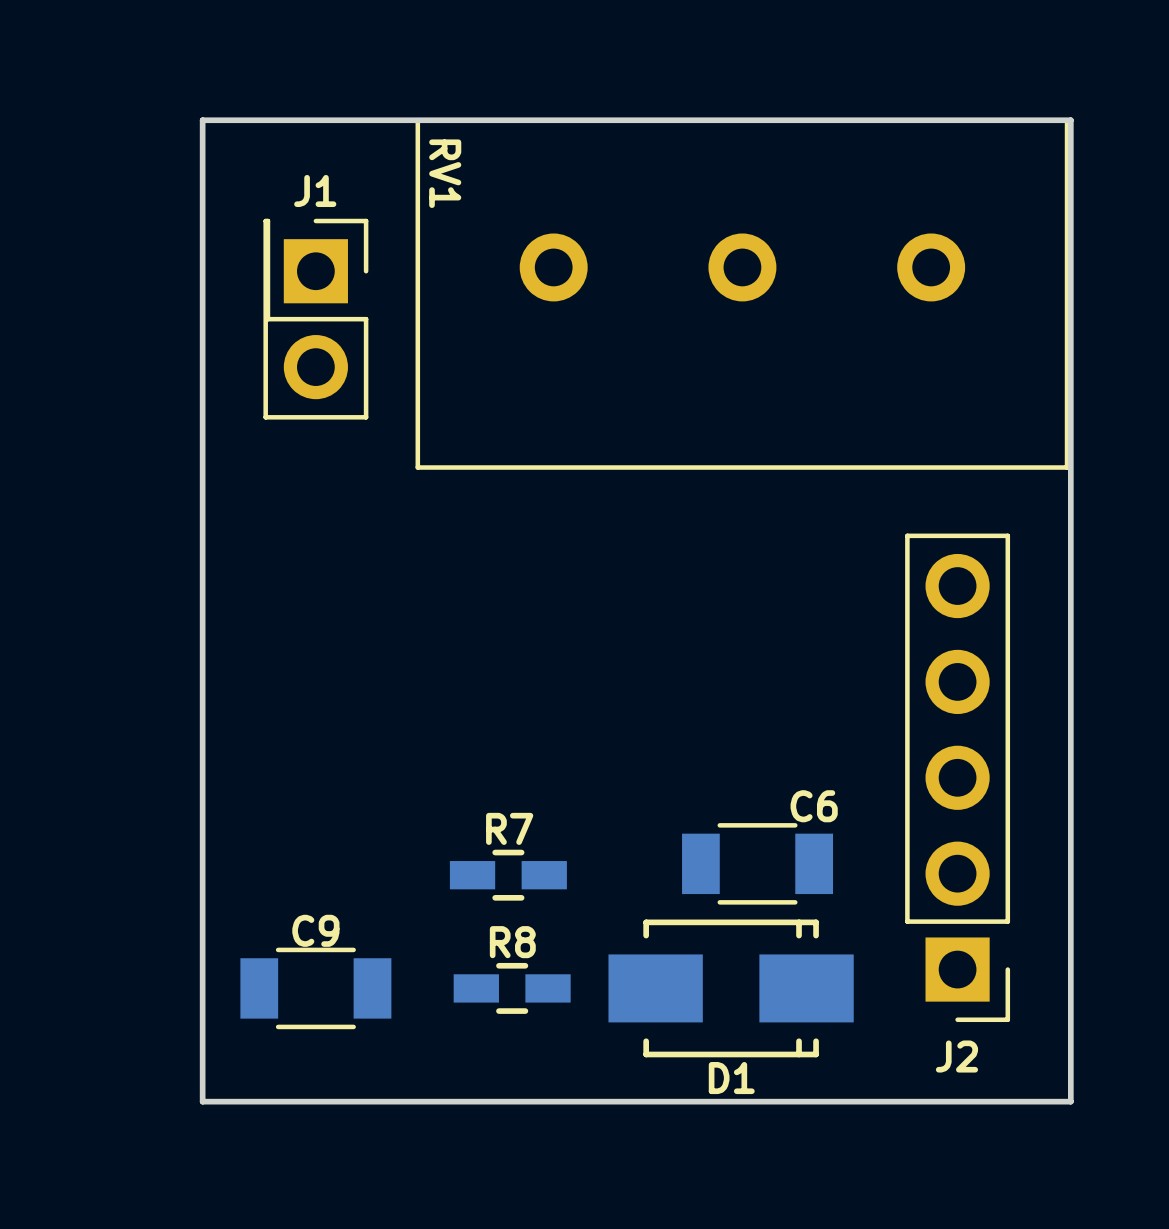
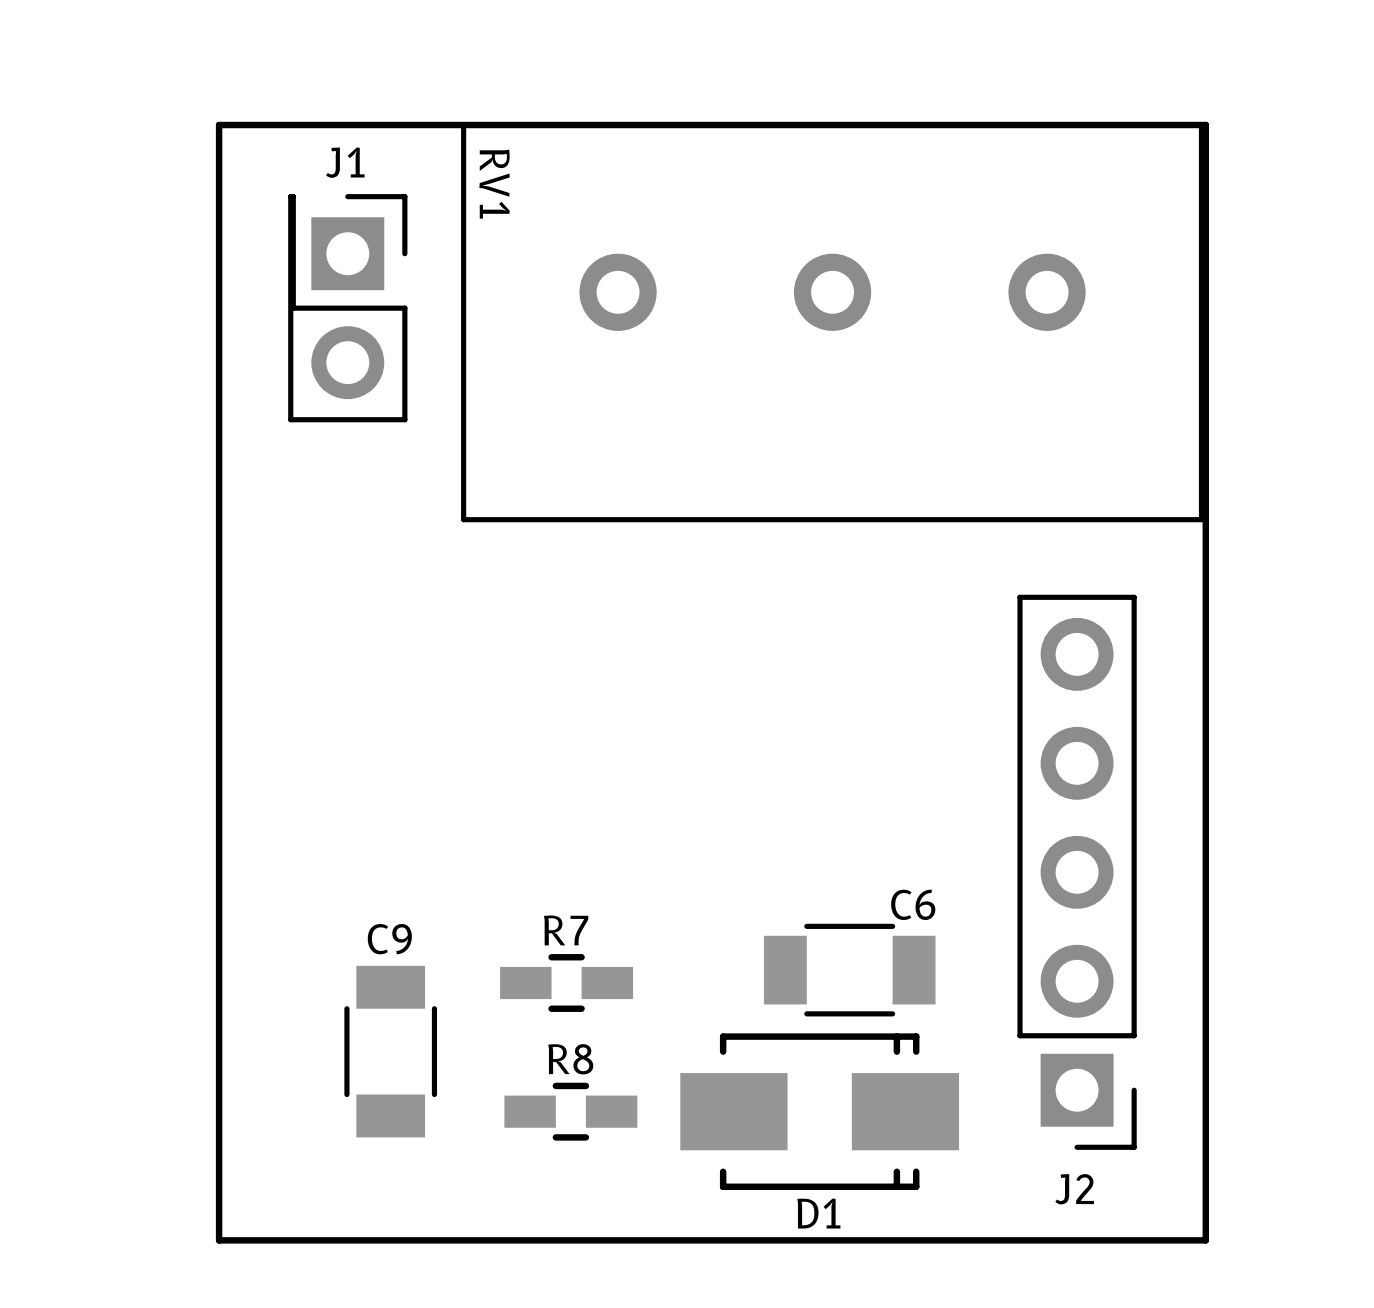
J1 position: (315, 319) -> (347, 308)
C9 rotation: 0° (315, 988) -> 90° clockwise (390, 1051)

